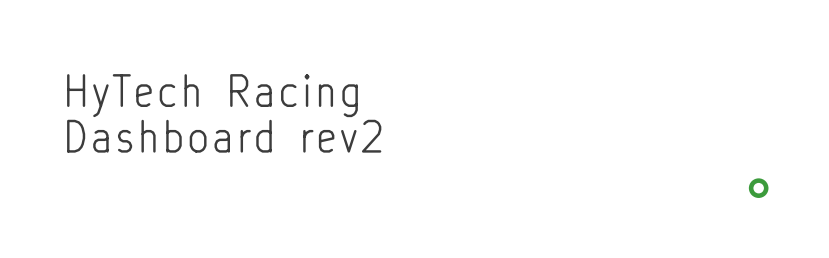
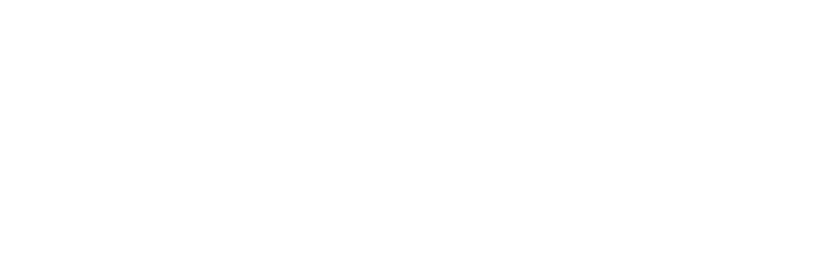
text: HyTech Racing (212, 95) -> none
text: Dashboard rev2 (224, 136) -> none
via: (758, 188) -> none

